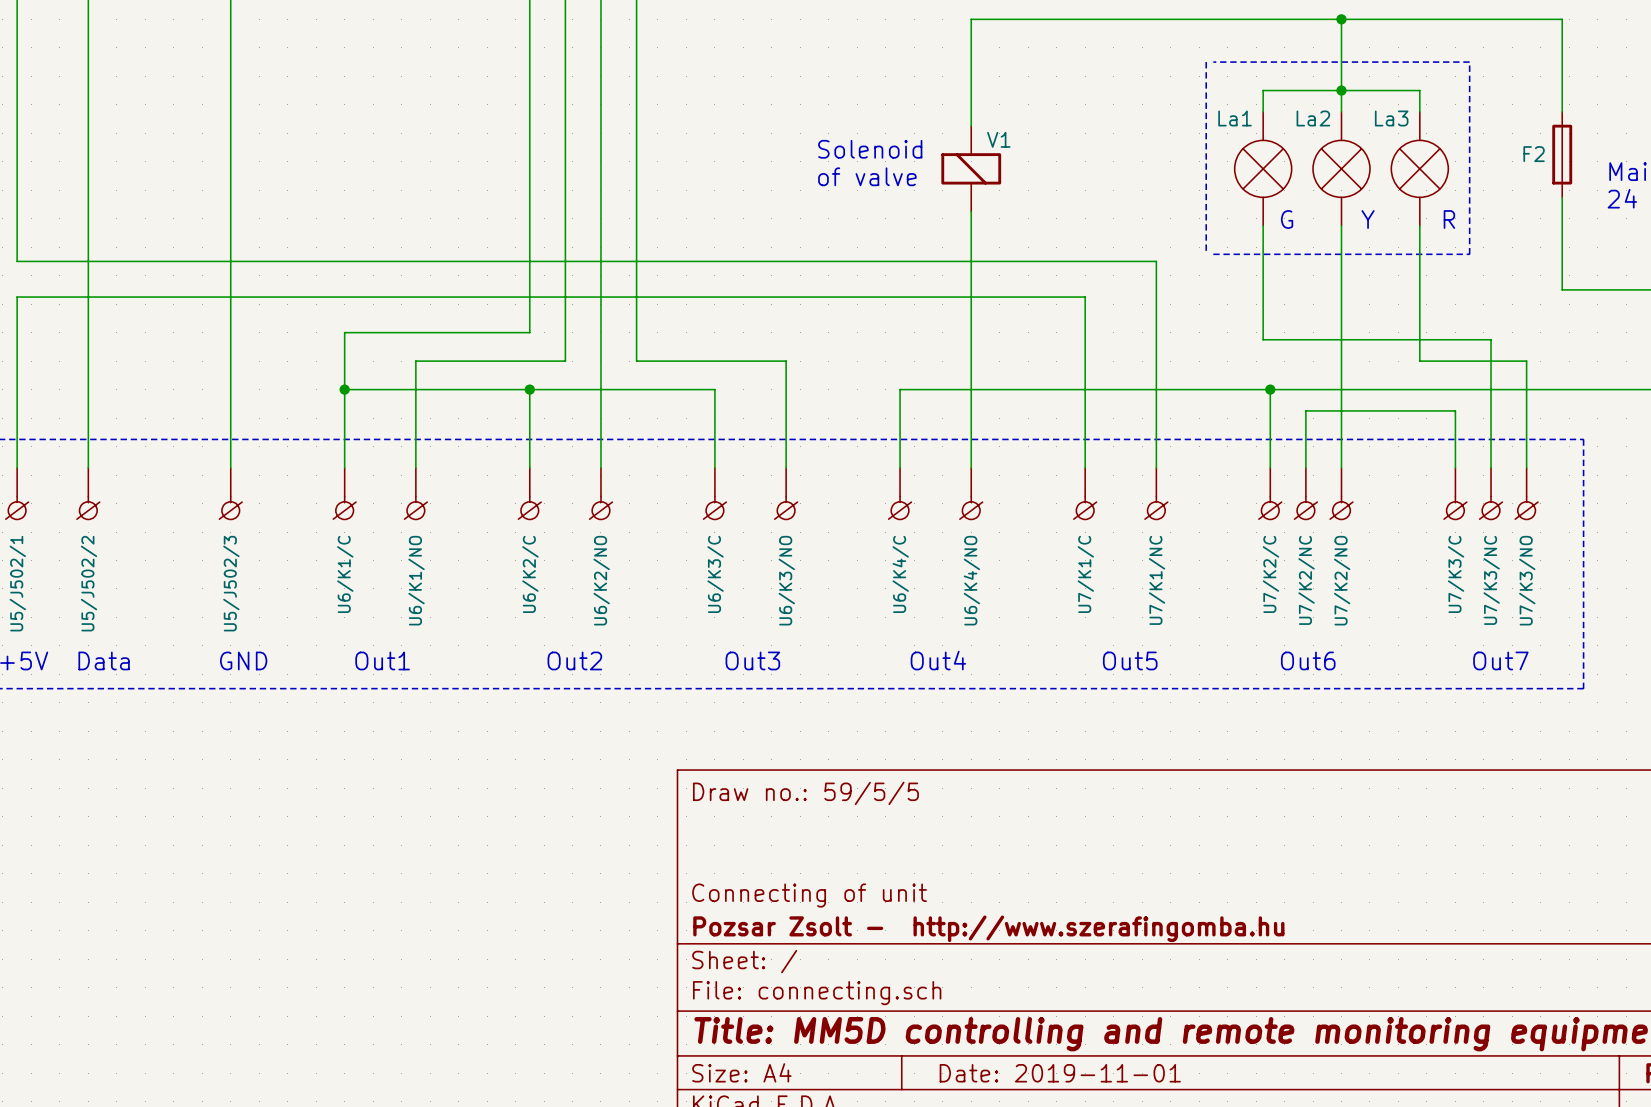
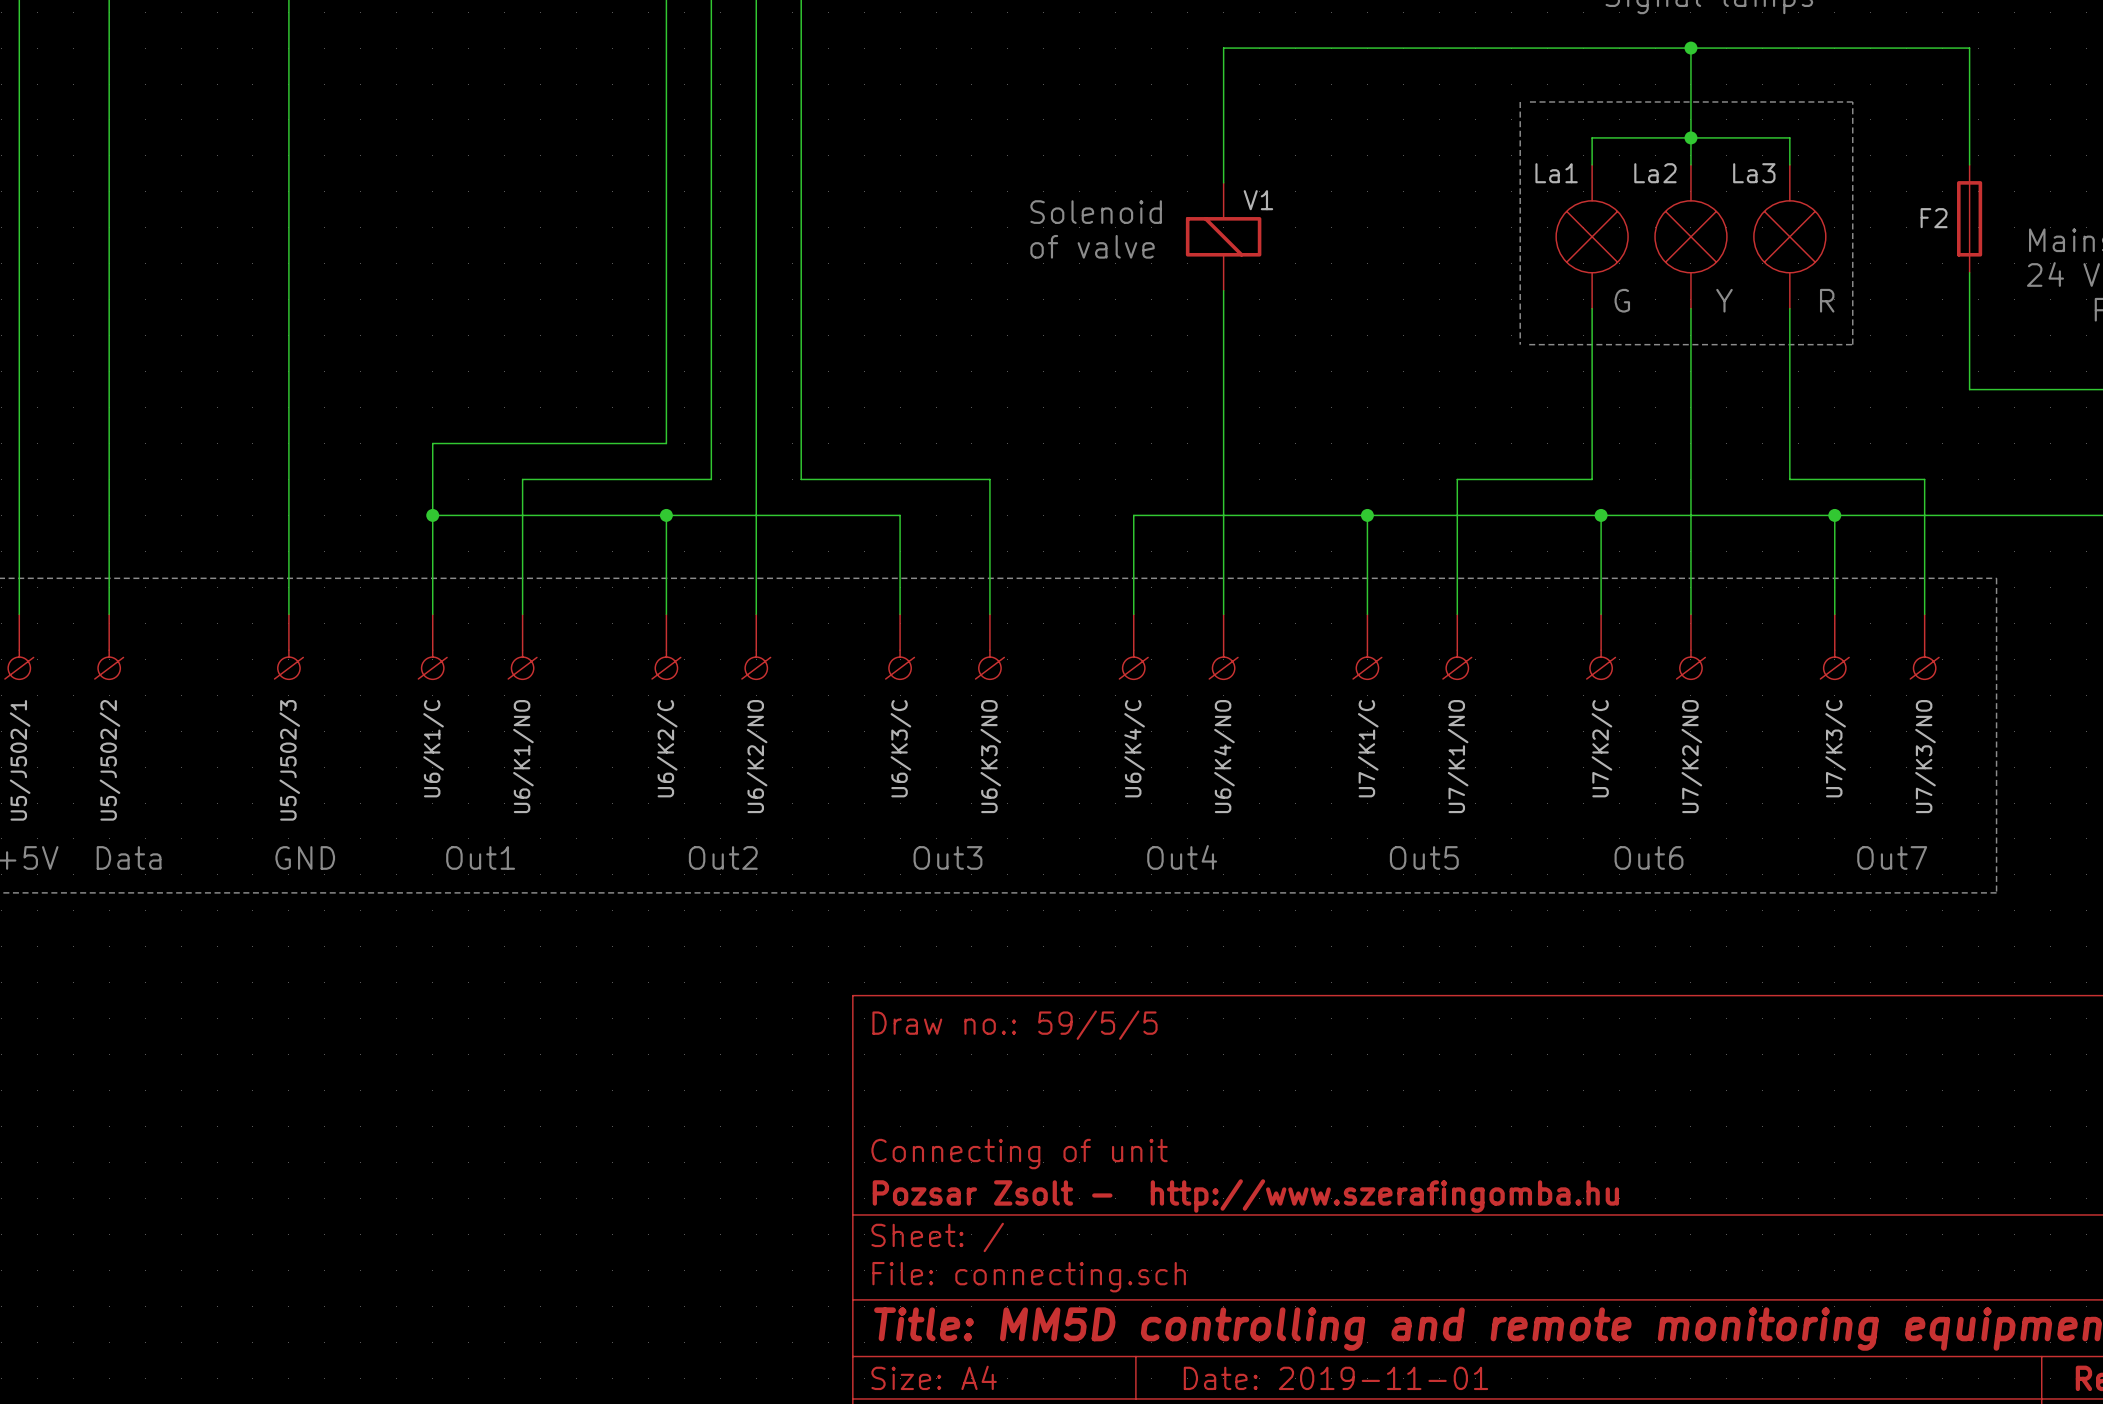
wire: (17, 261) (1156, 261) (1156, 361) -> none
wire: (17, 297) (1085, 297) (1085, 389) -> (19, 398) (19, 353)
wire: (1263, 339) (1491, 339) (1491, 467) -> (1592, 452) (1592, 479) (1457, 479)
junction: none -> (1367, 515)
junction: none -> (1834, 515)
wire: (1455, 410) (1305, 410) (1305, 467) -> (1834, 542) (1834, 515)
U7/K2/NC: (1305, 493) -> none
U7/K3/NC: (1491, 493) -> none
U7/K1/NC name: U7/K1/NC (1157, 580) -> U7/K1/NO (1458, 756)

